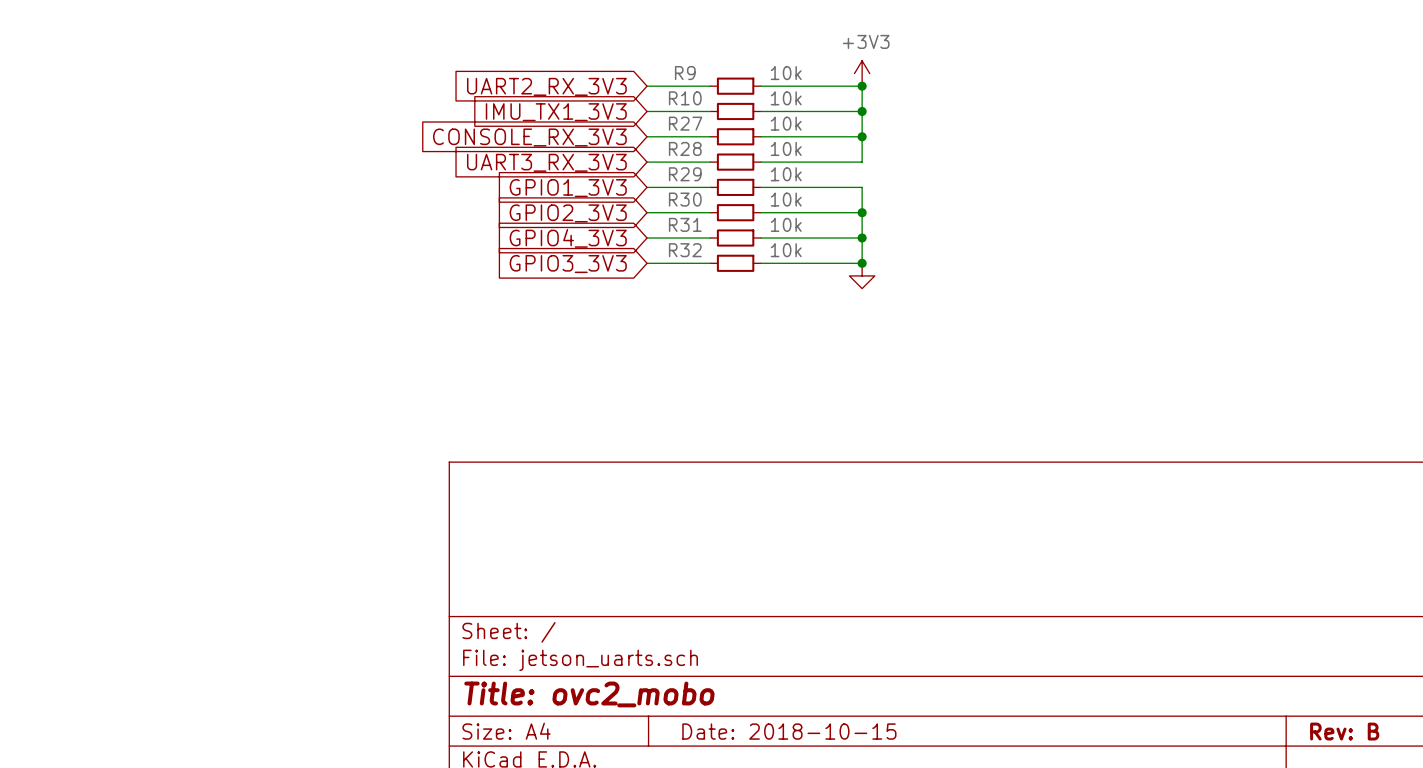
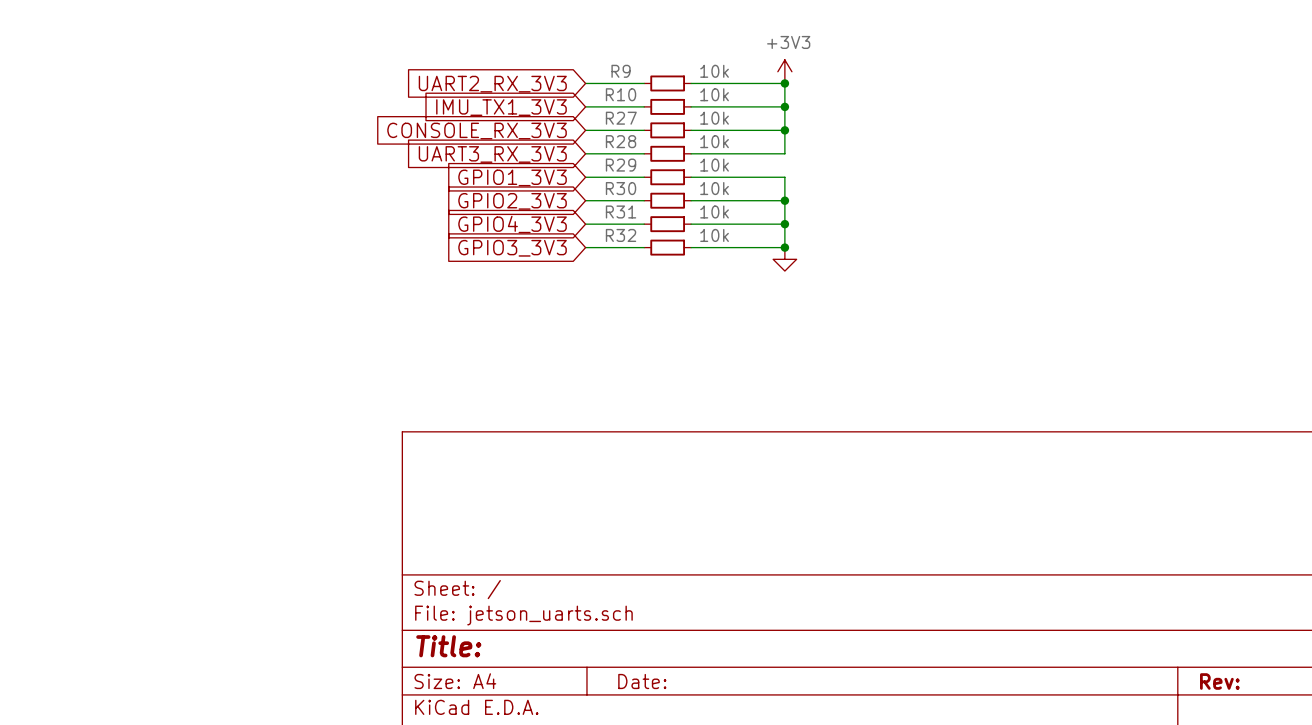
title block: Title: ovc2_mobo (589, 694) -> Title: (448, 646)
title block: Date: 2018-10-15 (789, 731) -> Date: (642, 681)
title block: Rev: B (1344, 731) -> Rev: (1219, 681)

